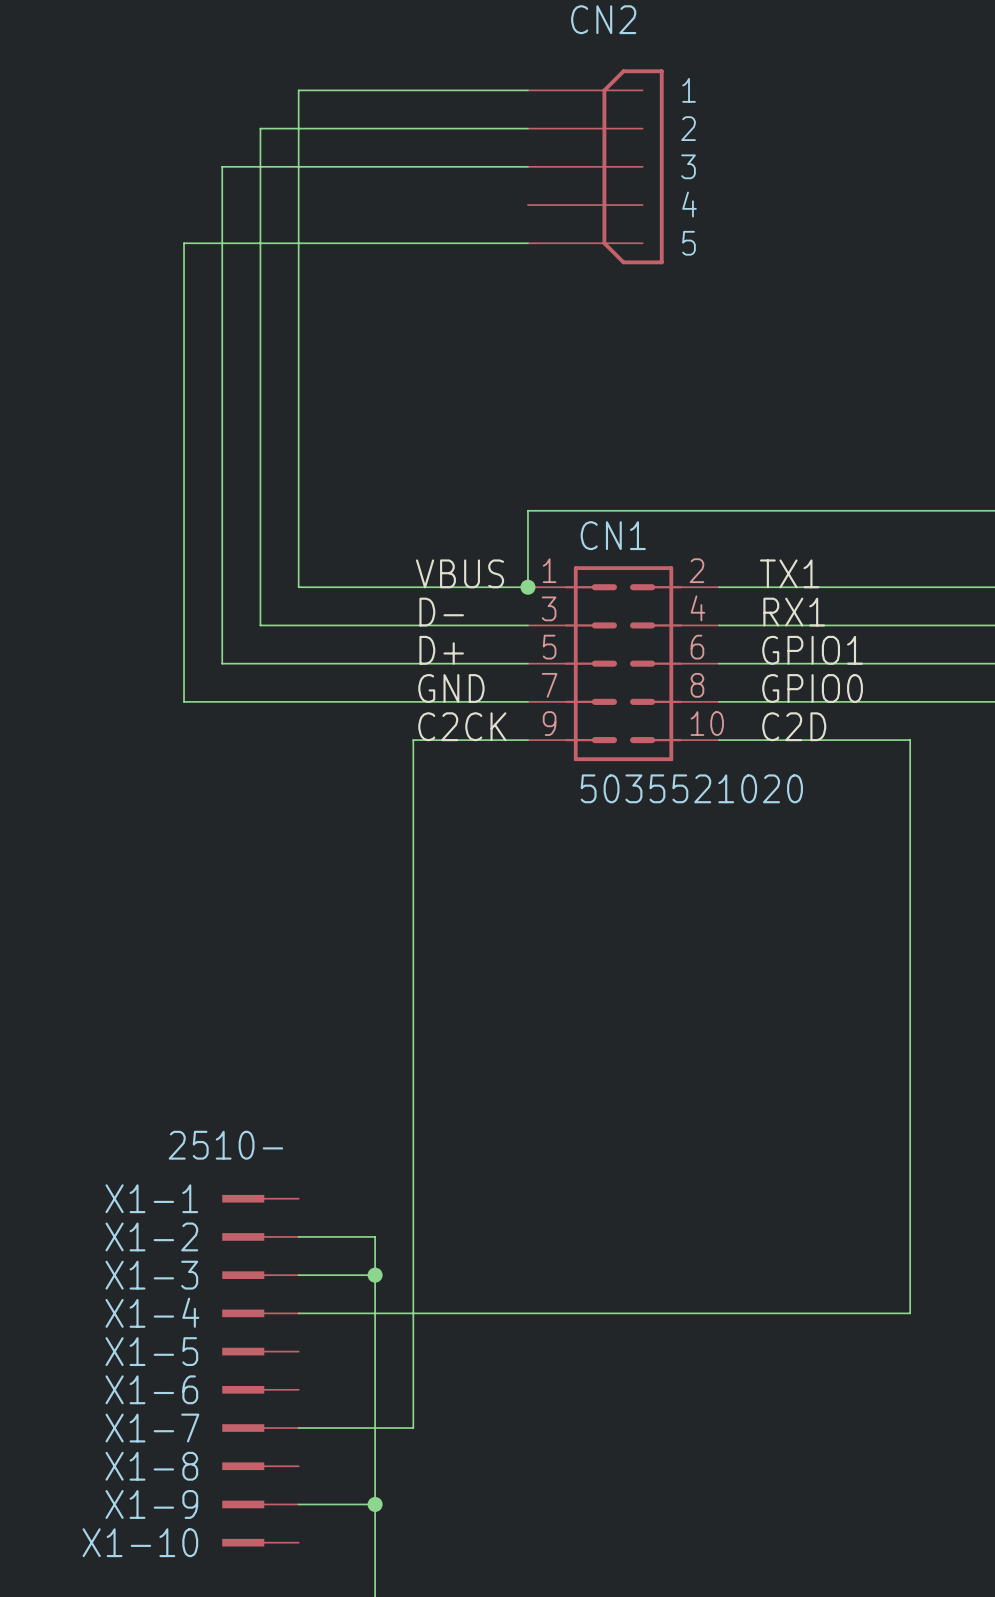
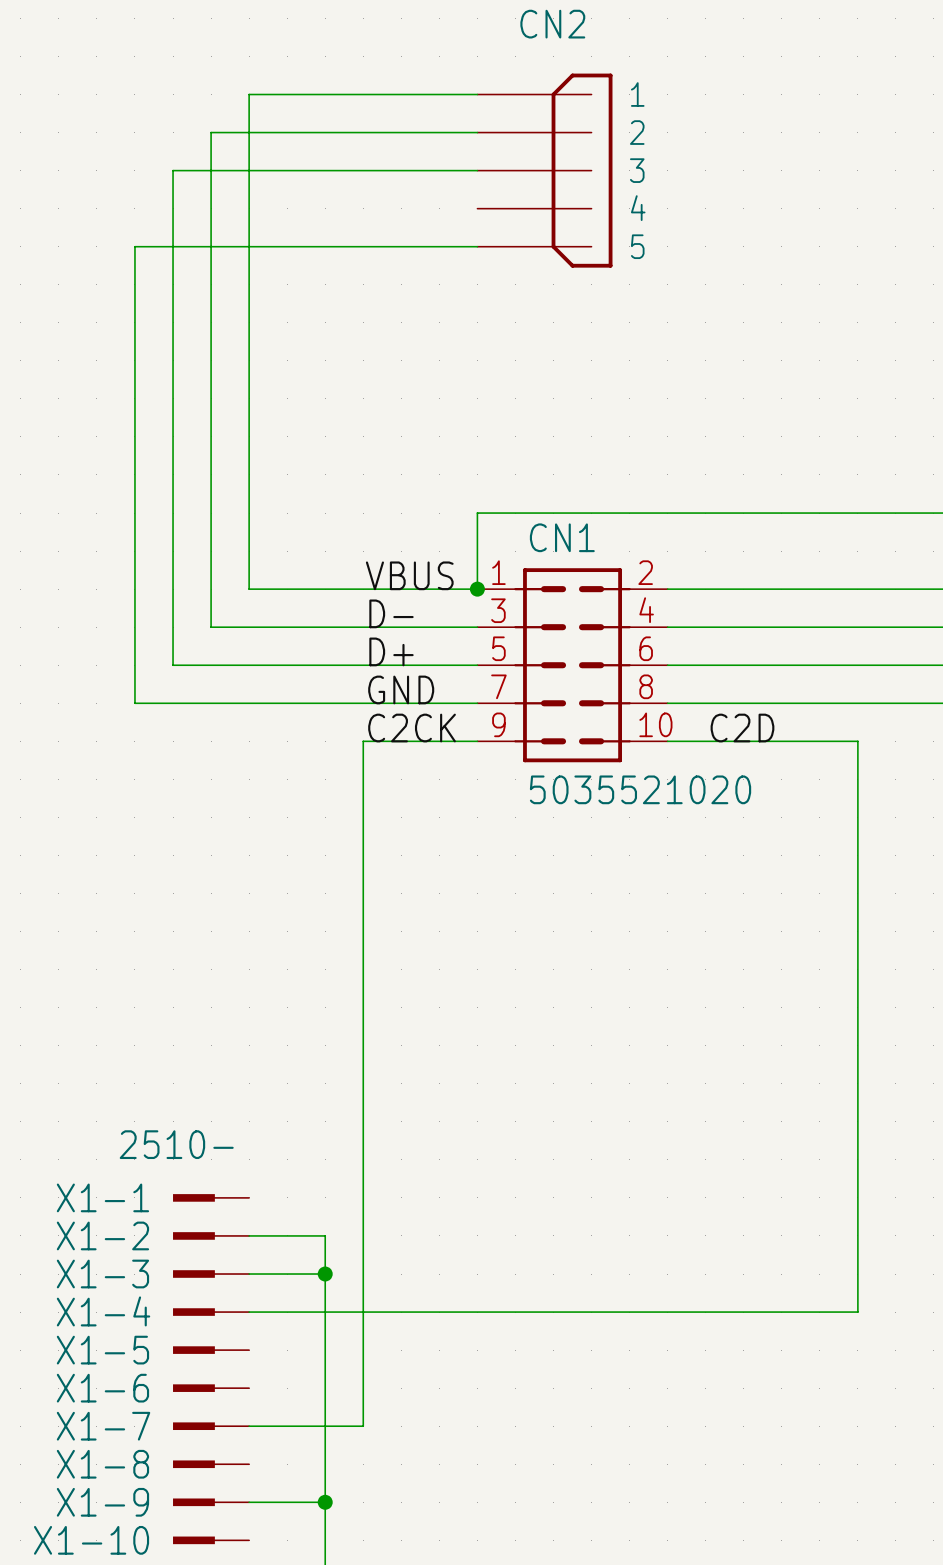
label: TX1 (789, 573) -> none
label: RX1 (794, 612) -> none
label: GPIO1 (812, 650) -> none
label: GPIO0 (812, 688) -> none

